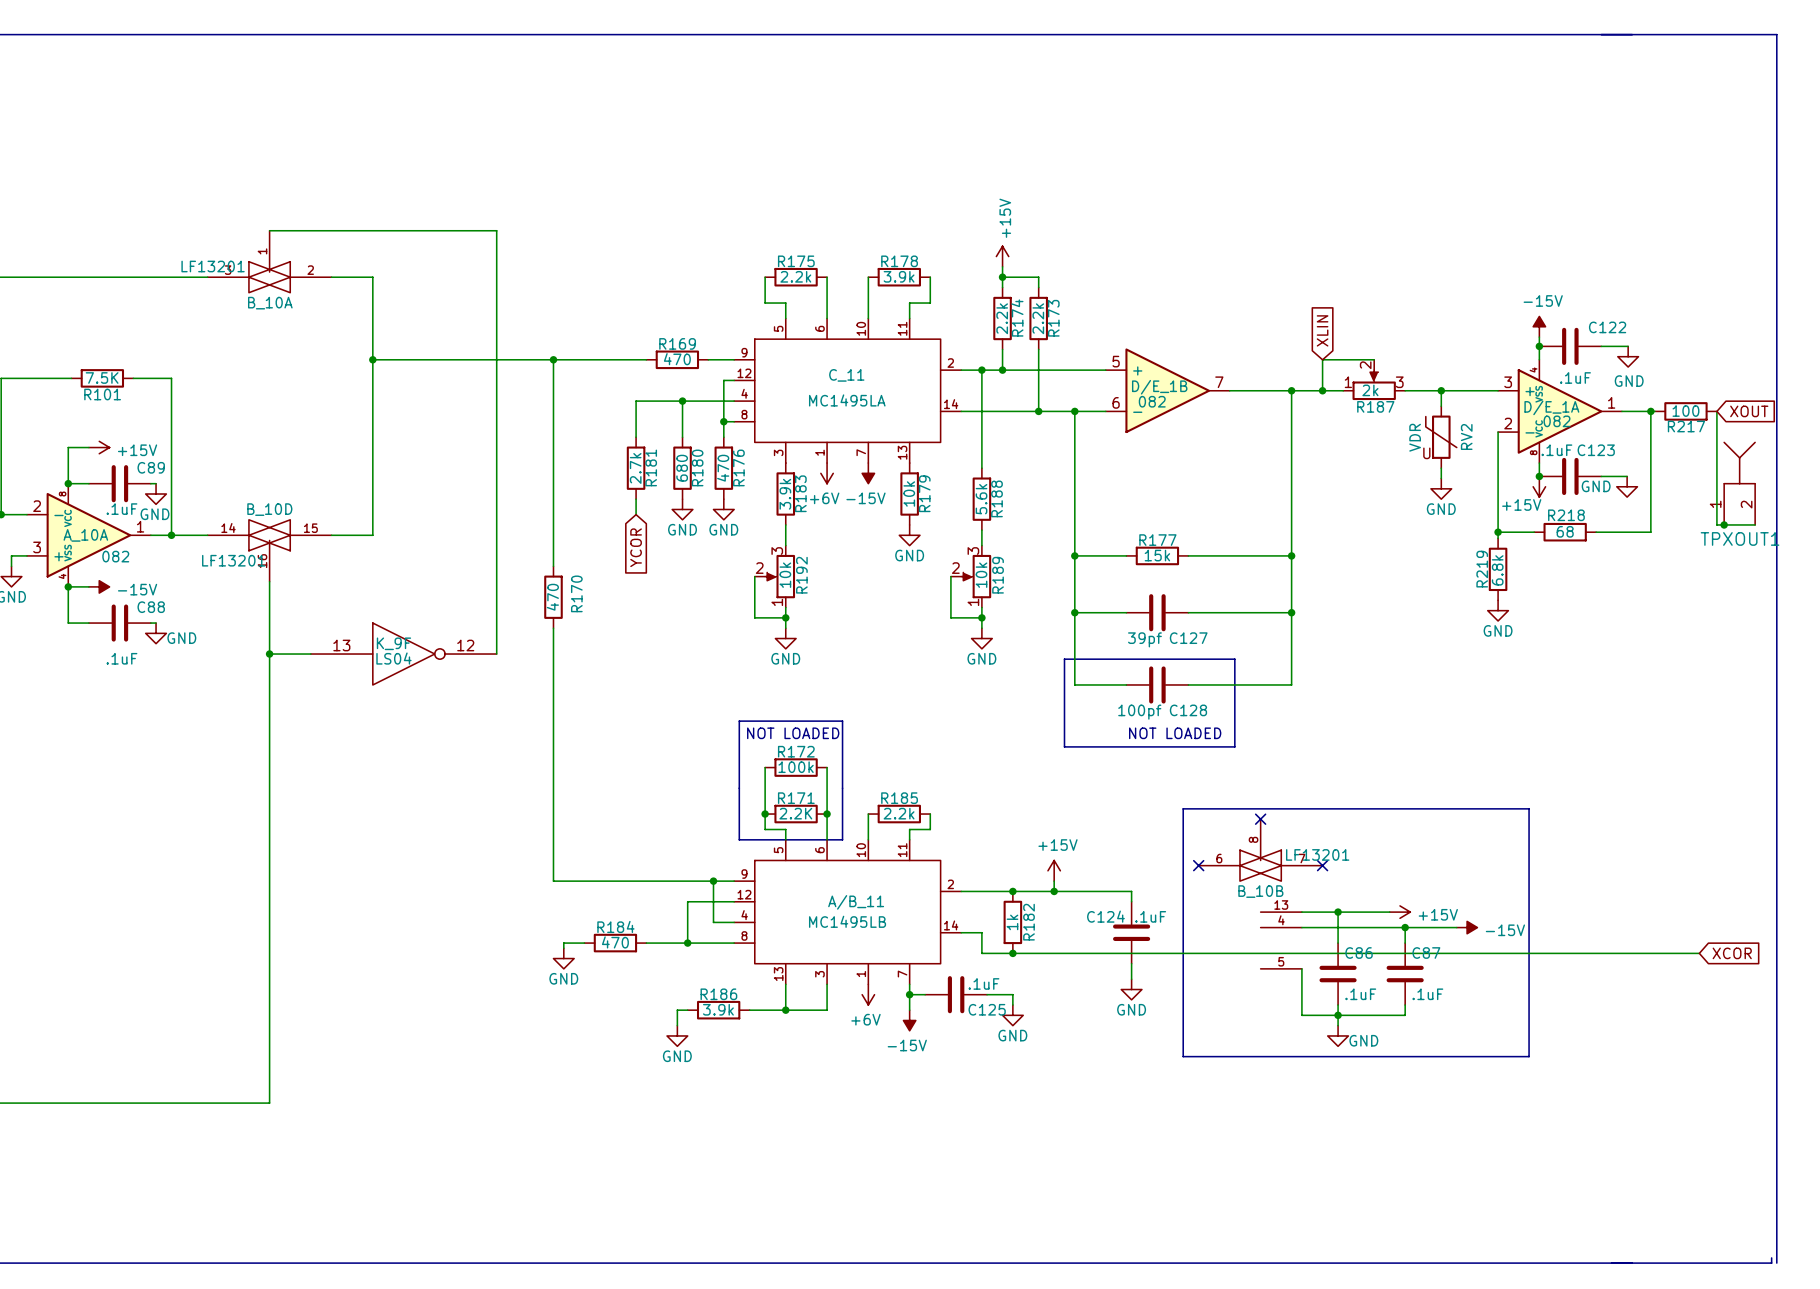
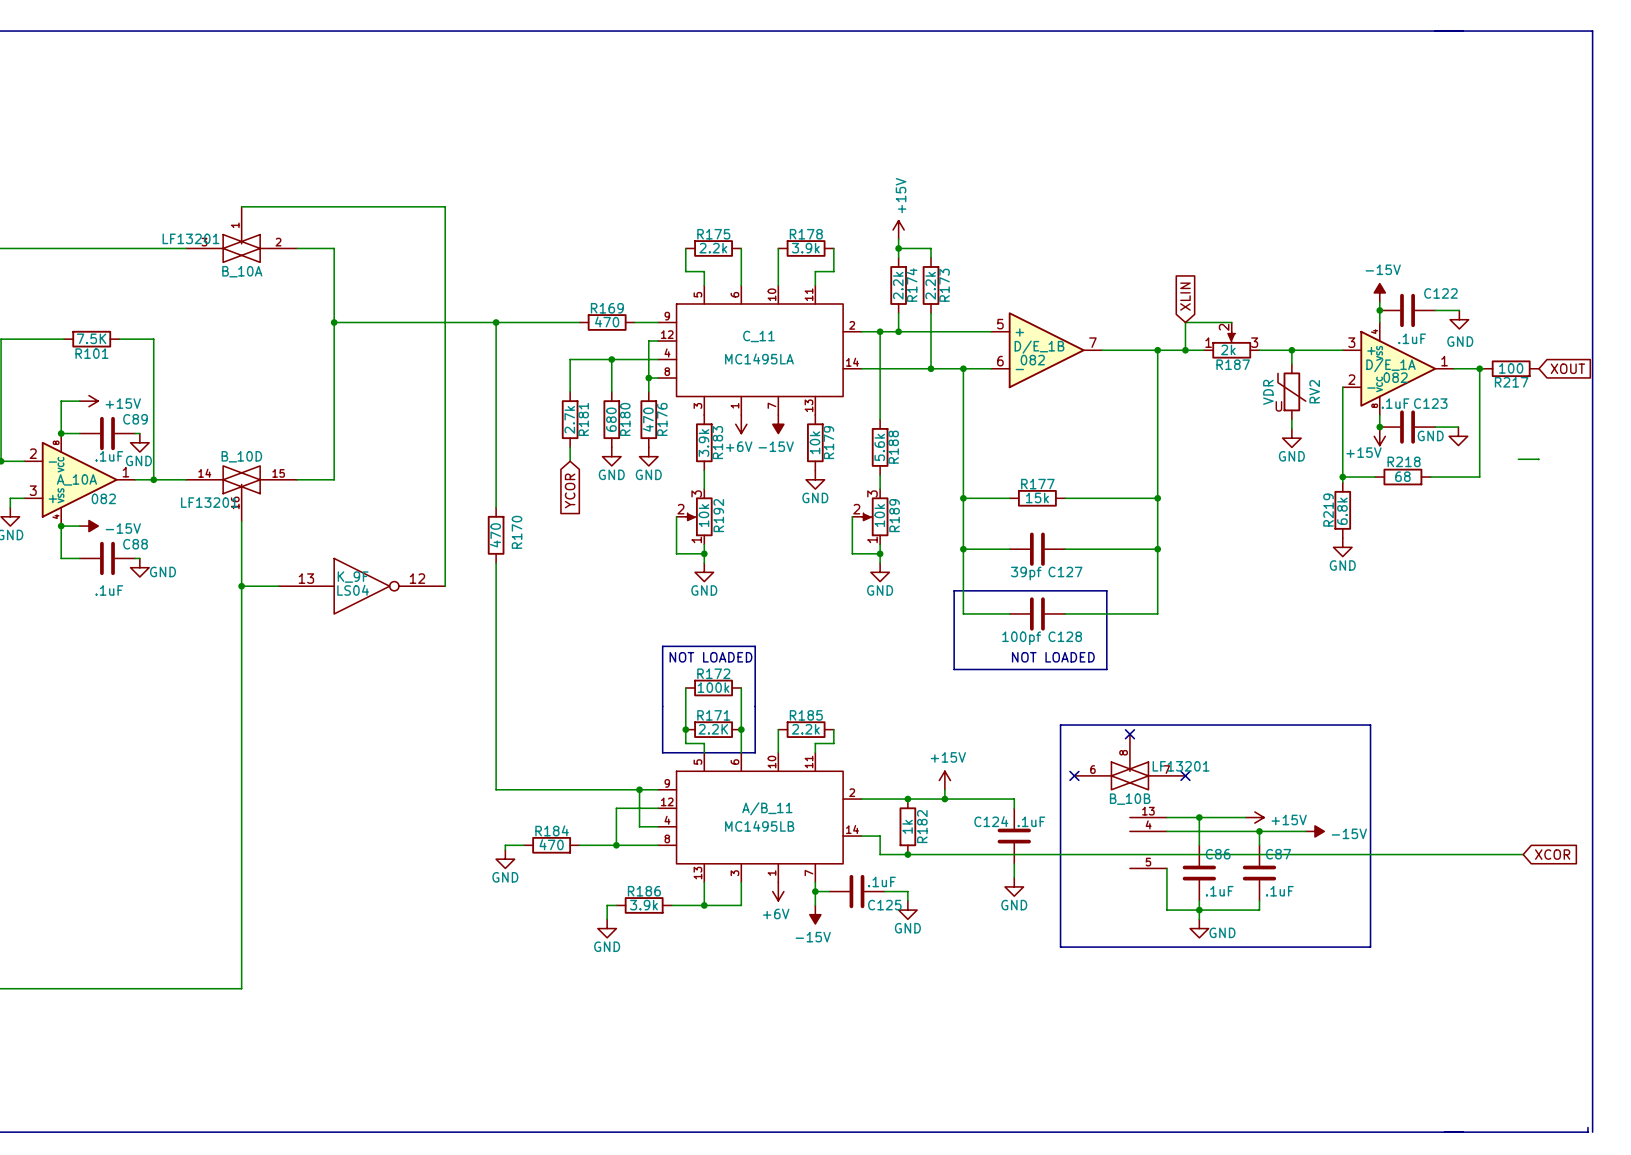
wire: (1716, 411) (1716, 524) (1755, 524) -> none
TPXOUT1: (1739, 483) -> none
wire: none -> (1518, 459) (1538, 459)
junction: (1724, 524) -> none

